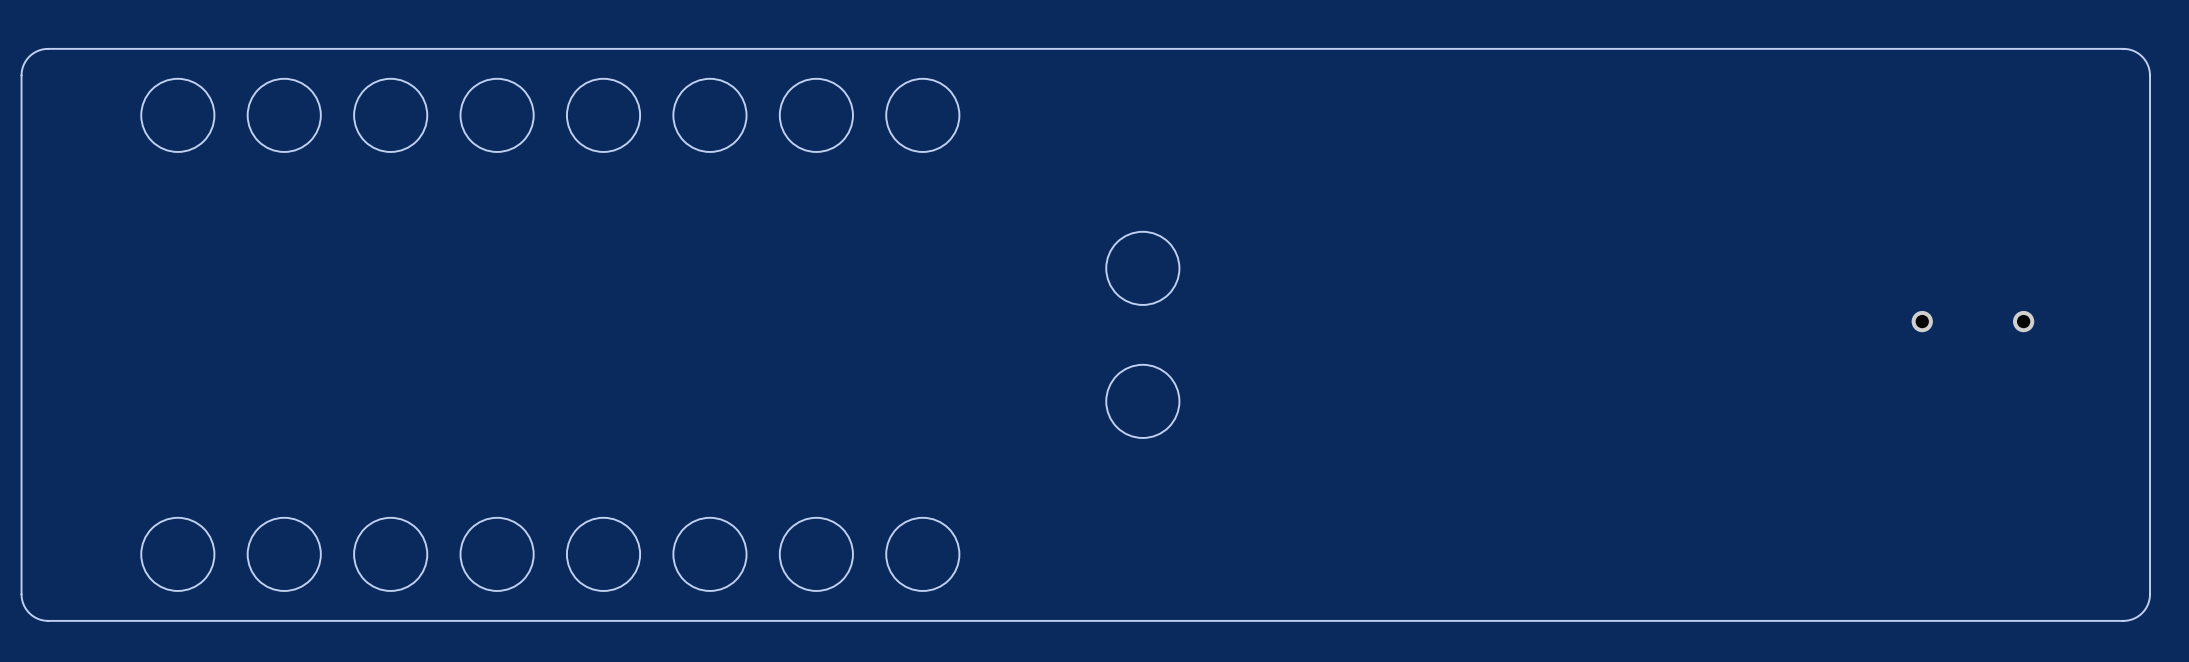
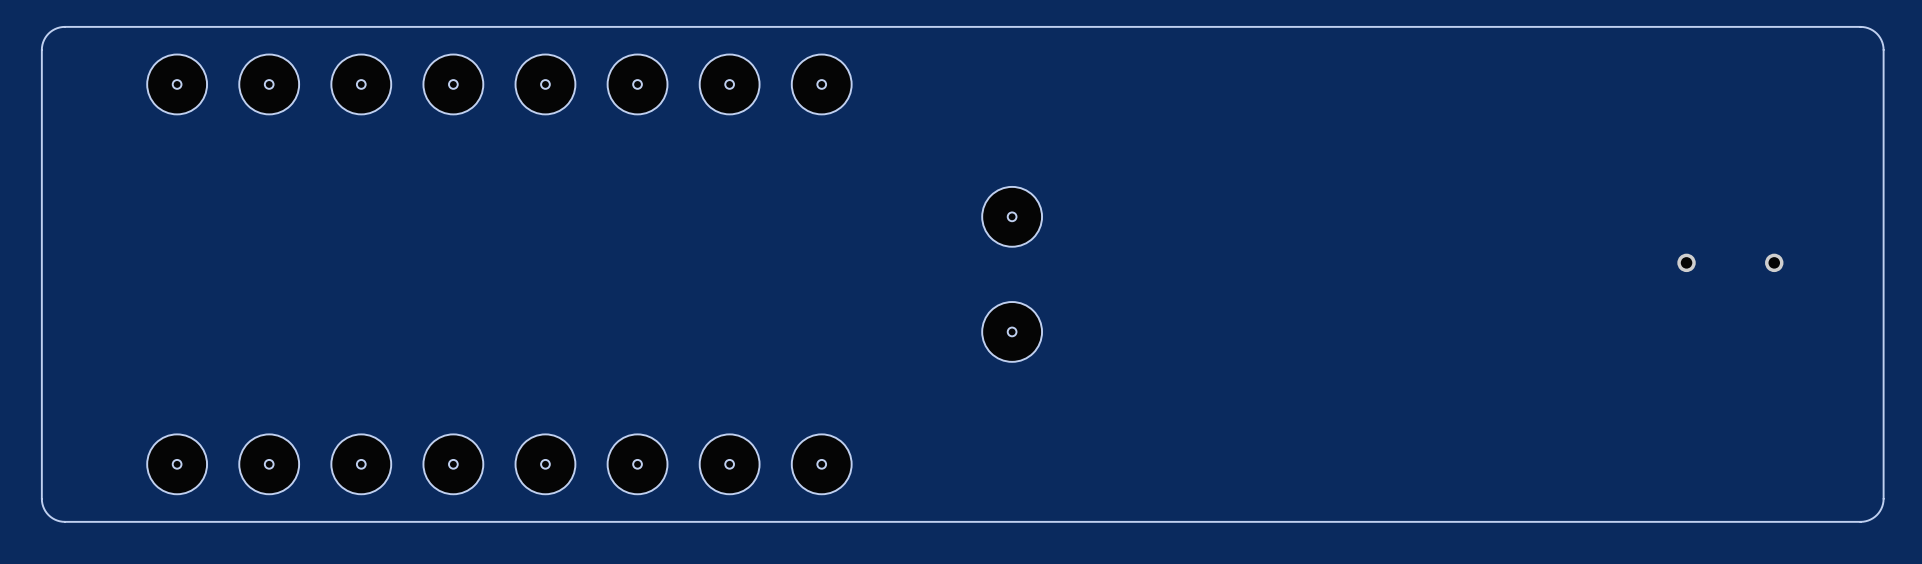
round board edge: [140, 78, 216, 153] -> none
round board edge: [247, 78, 322, 153] -> none
round board edge: [353, 78, 428, 153] -> none
round board edge: [459, 78, 535, 153] -> none
round board edge: [566, 78, 641, 153] -> none
round board edge: [672, 78, 748, 153] -> none
round board edge: [779, 78, 854, 153] -> none
round board edge: [885, 78, 961, 153] -> none
part: none -> (177, 84)
part: none -> (269, 84)
part: none -> (361, 84)
part: none -> (453, 84)
part: none -> (545, 84)
part: none -> (637, 84)
part: none -> (729, 84)
part: none -> (821, 84)
round board edge: [1105, 231, 1181, 306] -> none
part: none -> (1012, 216)
round board edge: [1105, 364, 1181, 439] -> none
part: none -> (1012, 331)
round board edge: [140, 517, 216, 592] -> none
round board edge: [247, 517, 322, 592] -> none
round board edge: [353, 517, 428, 592] -> none
round board edge: [459, 517, 535, 592] -> none
round board edge: [566, 517, 641, 592] -> none
round board edge: [672, 517, 748, 592] -> none
round board edge: [779, 517, 854, 592] -> none
round board edge: [885, 517, 961, 592] -> none
part: none -> (177, 464)
part: none -> (269, 464)
part: none -> (361, 464)
part: none -> (453, 464)
part: none -> (545, 464)
part: none -> (637, 464)
part: none -> (729, 464)
part: none -> (821, 464)

